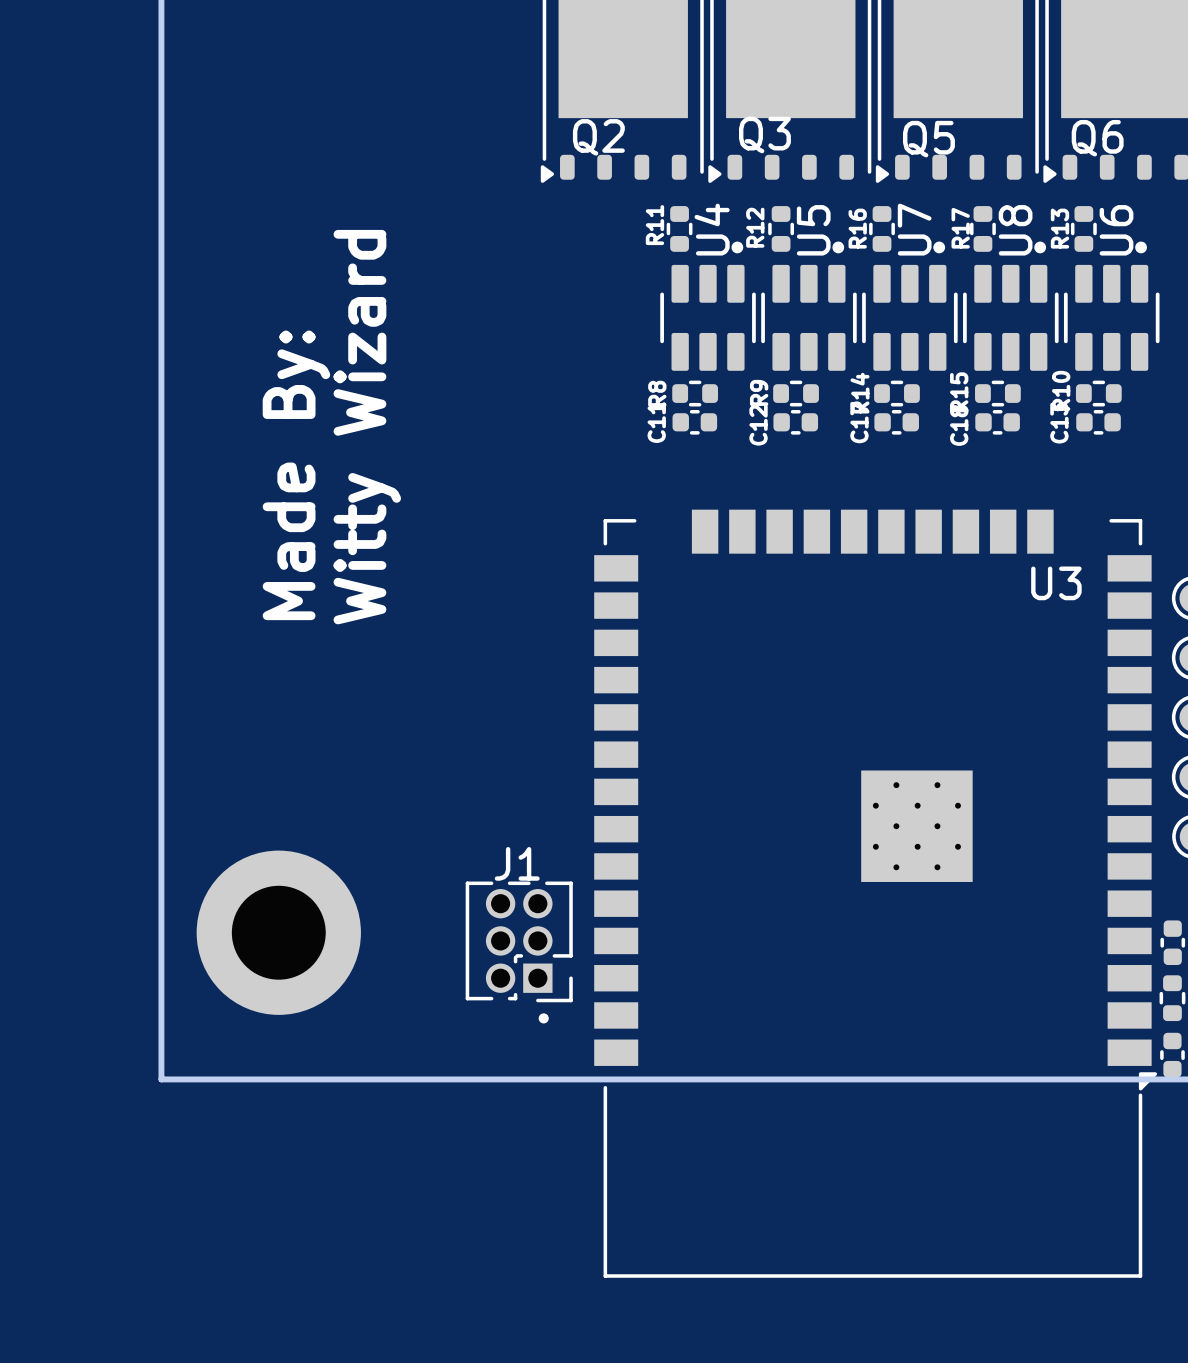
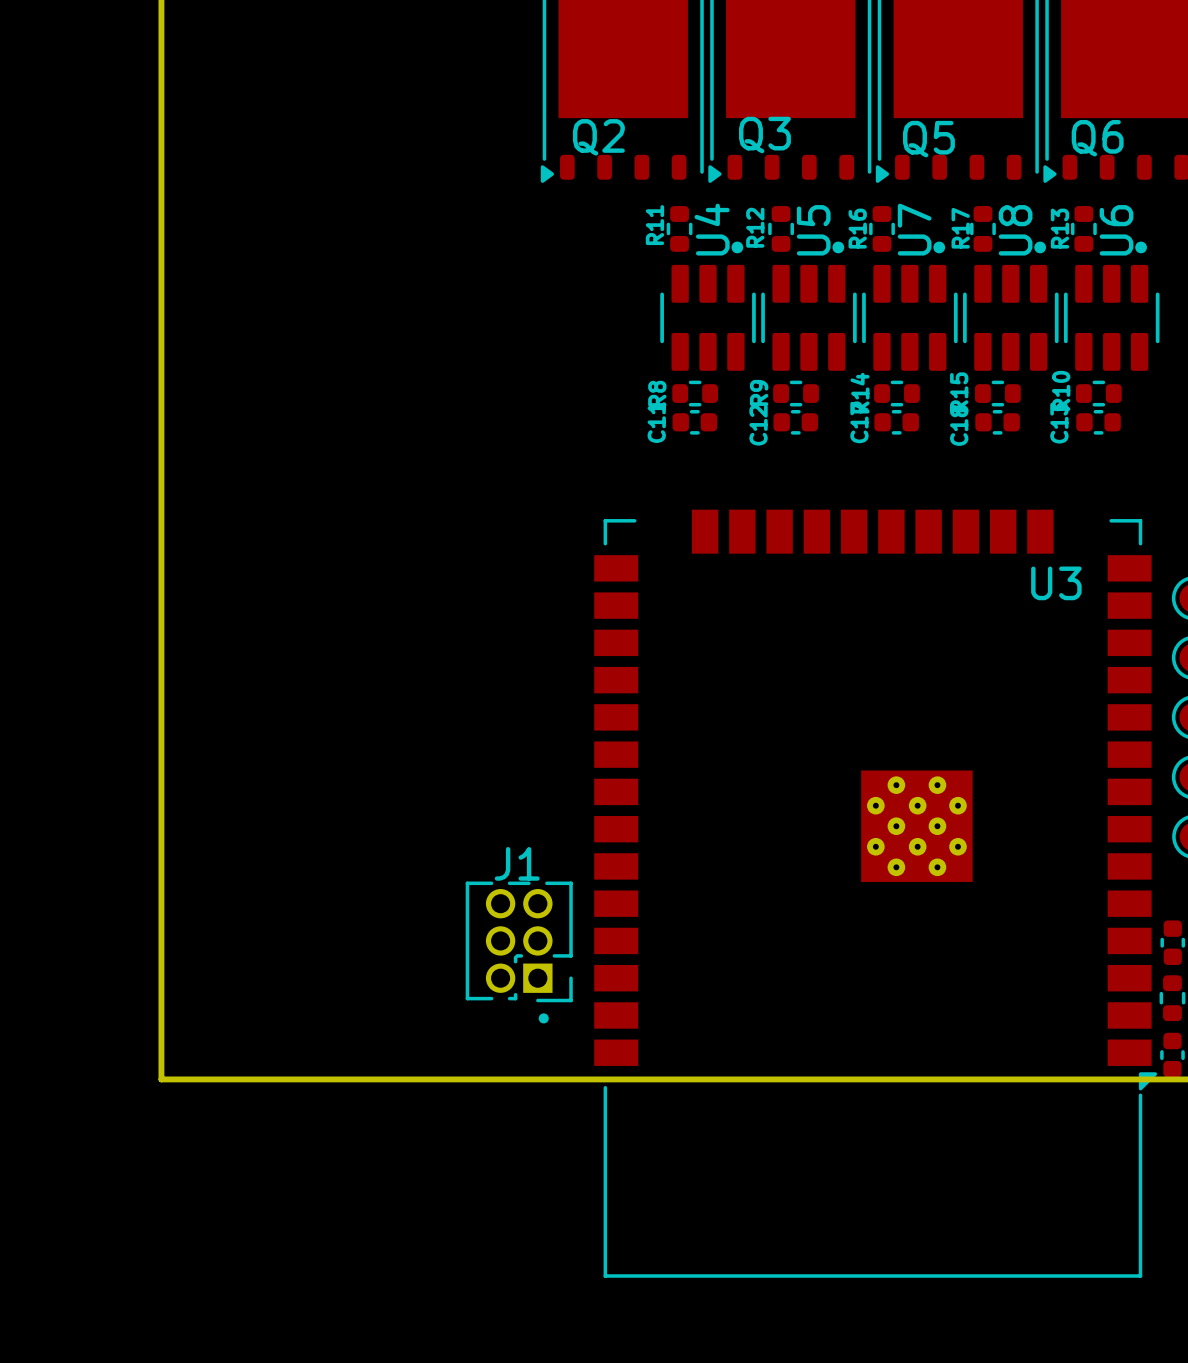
text: Witty Wizard (367, 427) -> none
text: Made By: (296, 475) -> none
part: (278, 932) -> none

